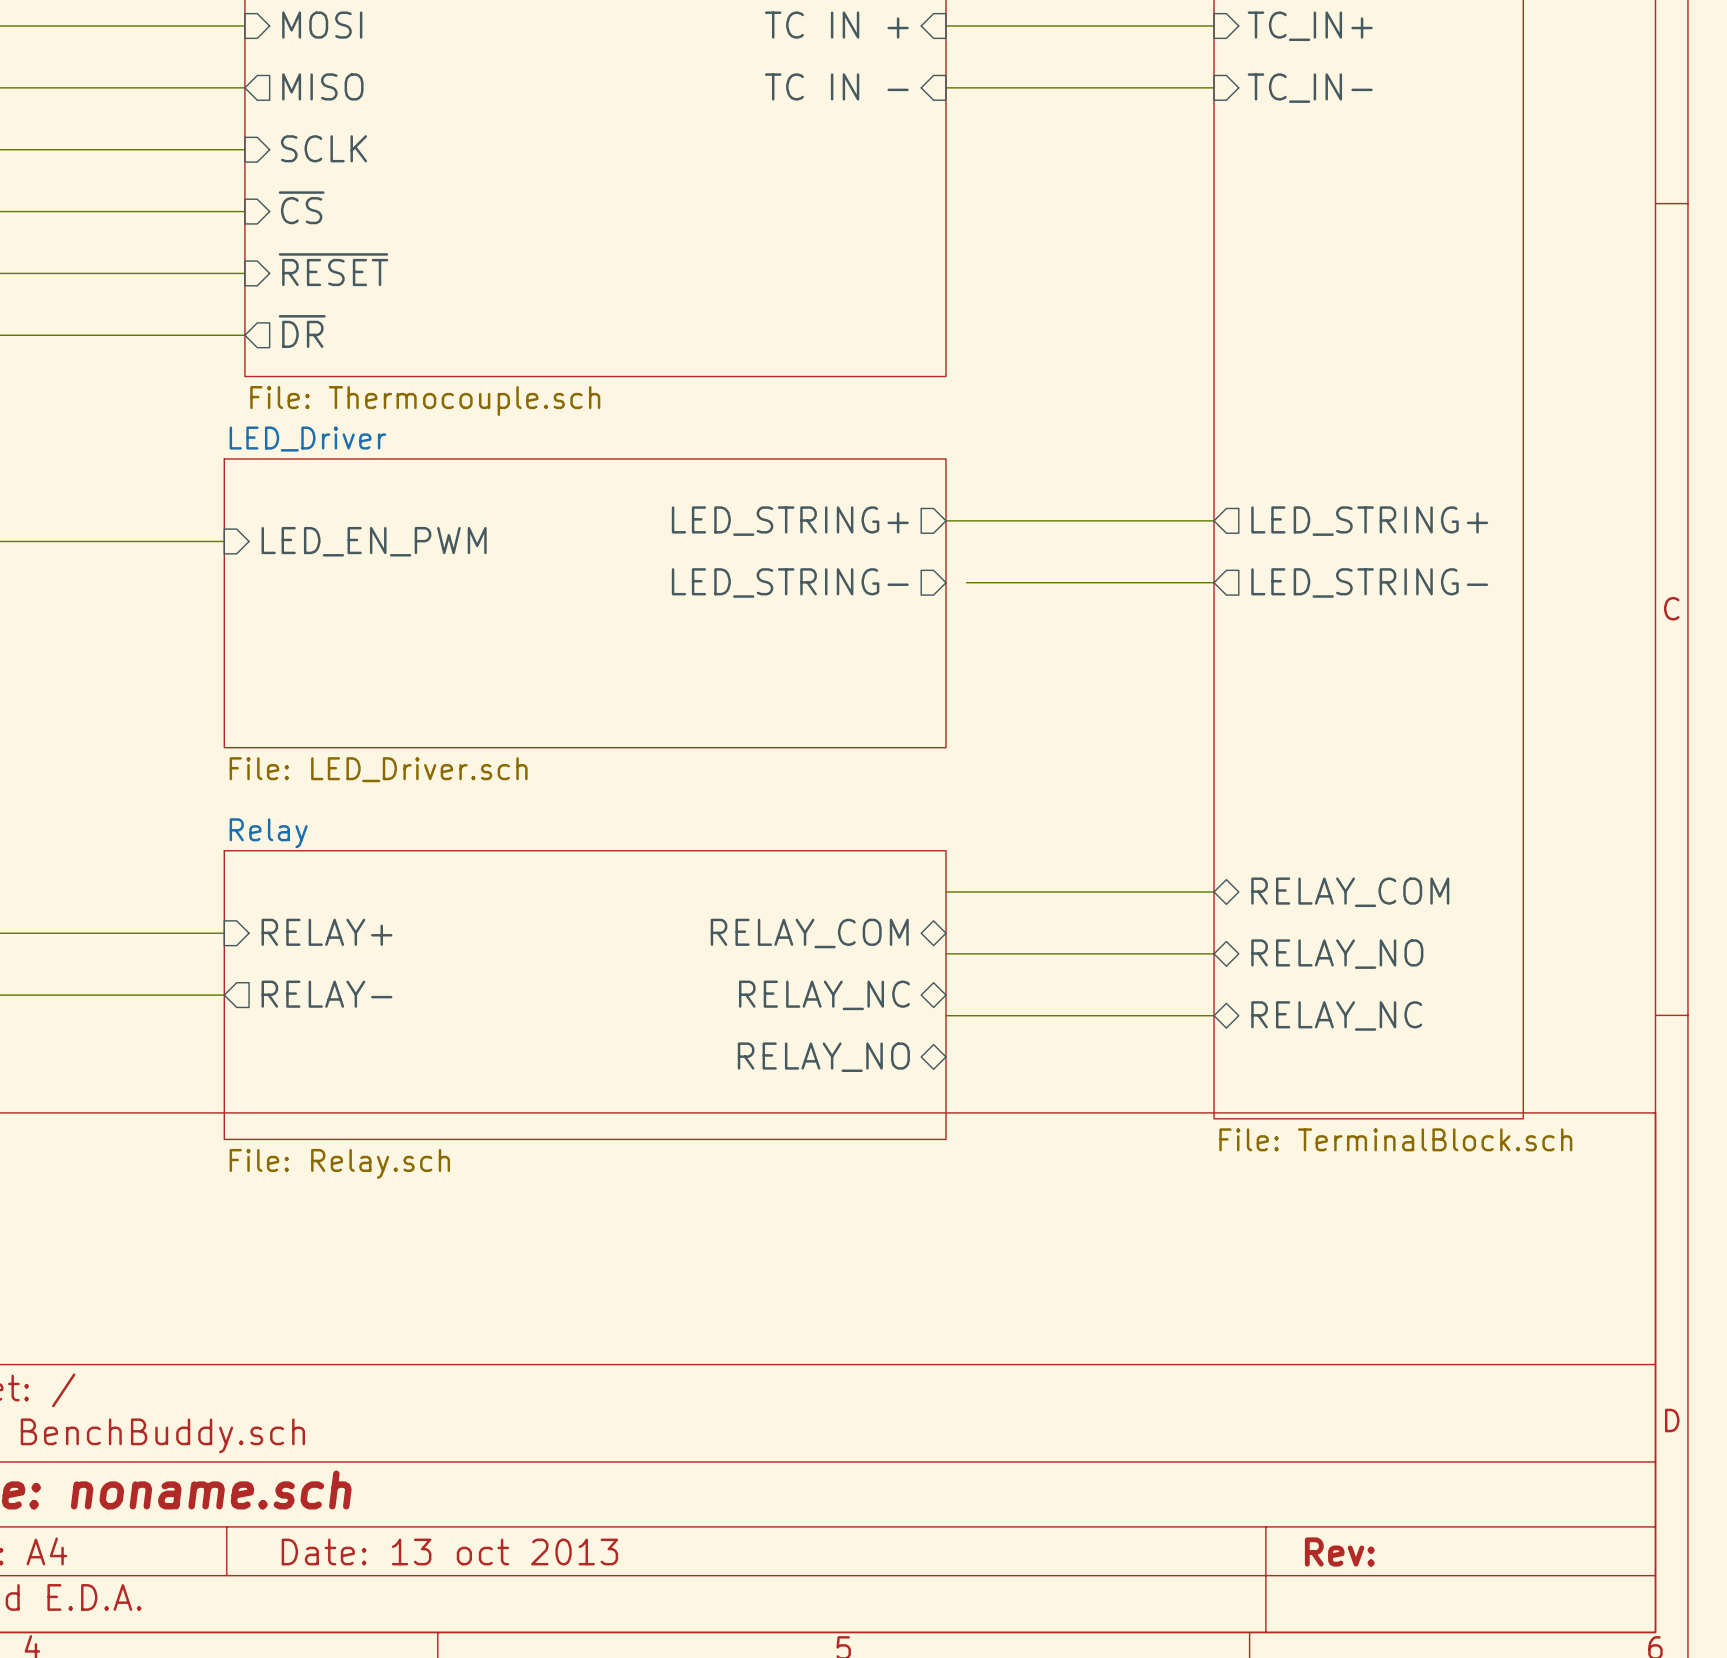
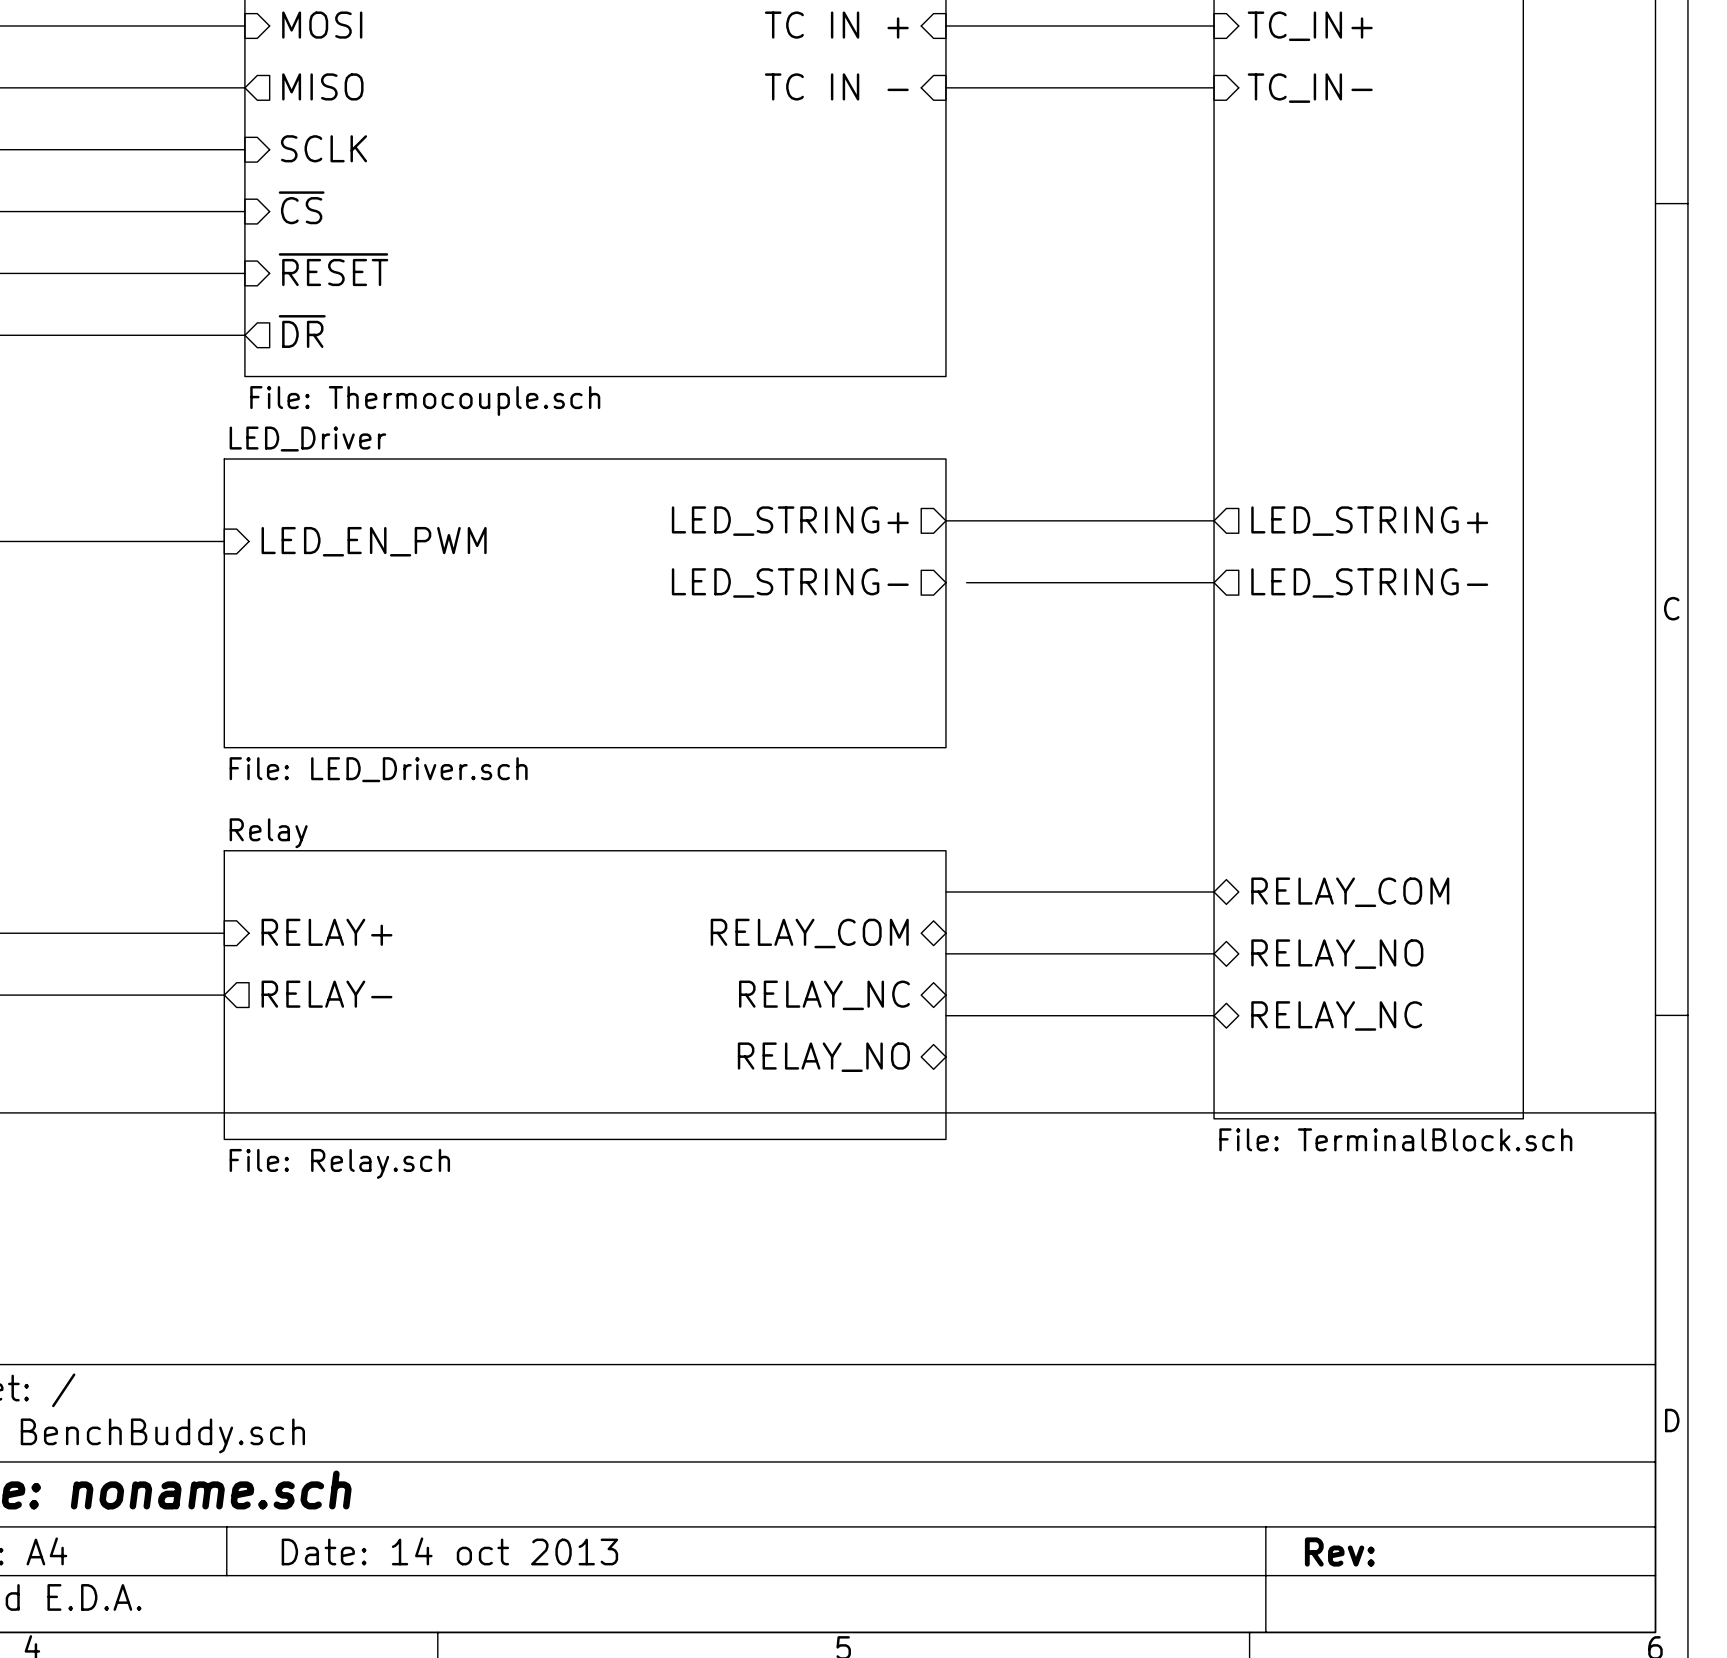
title block: Date: 13 oct 2013 (449, 1551) -> Date: 14 oct 2013 (449, 1551)

